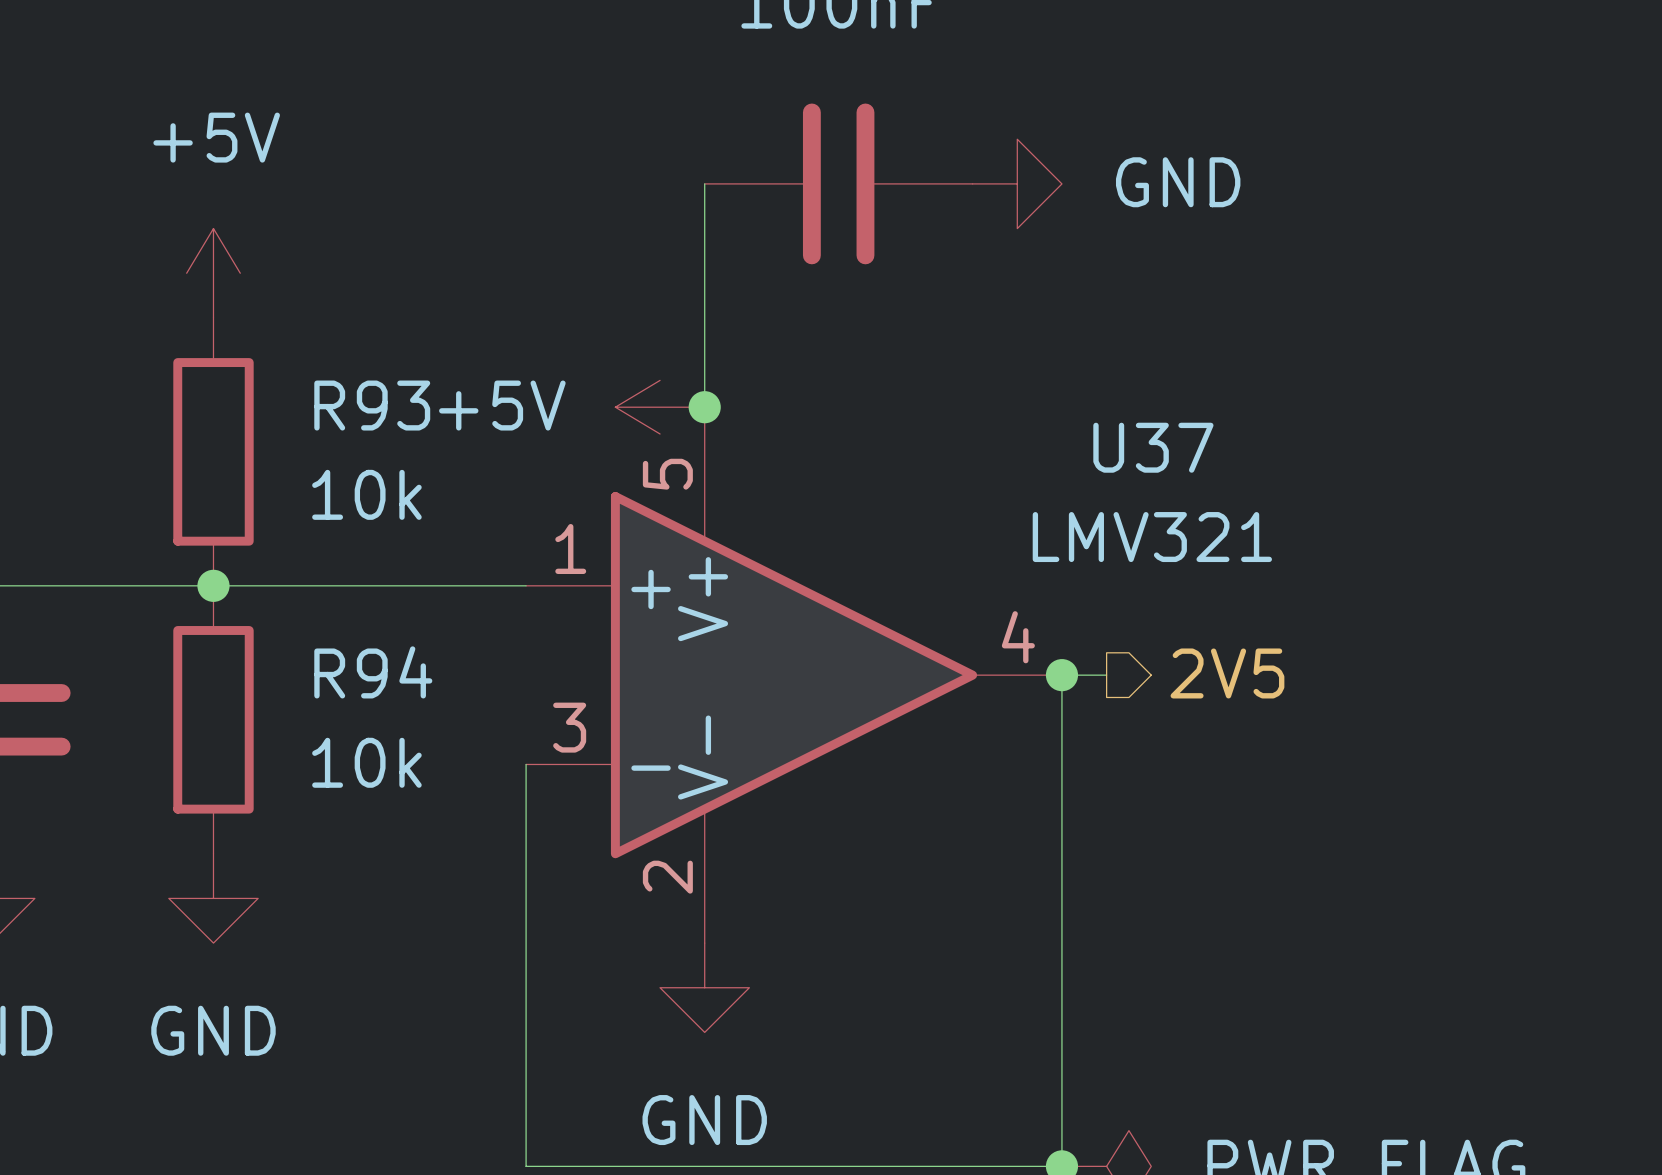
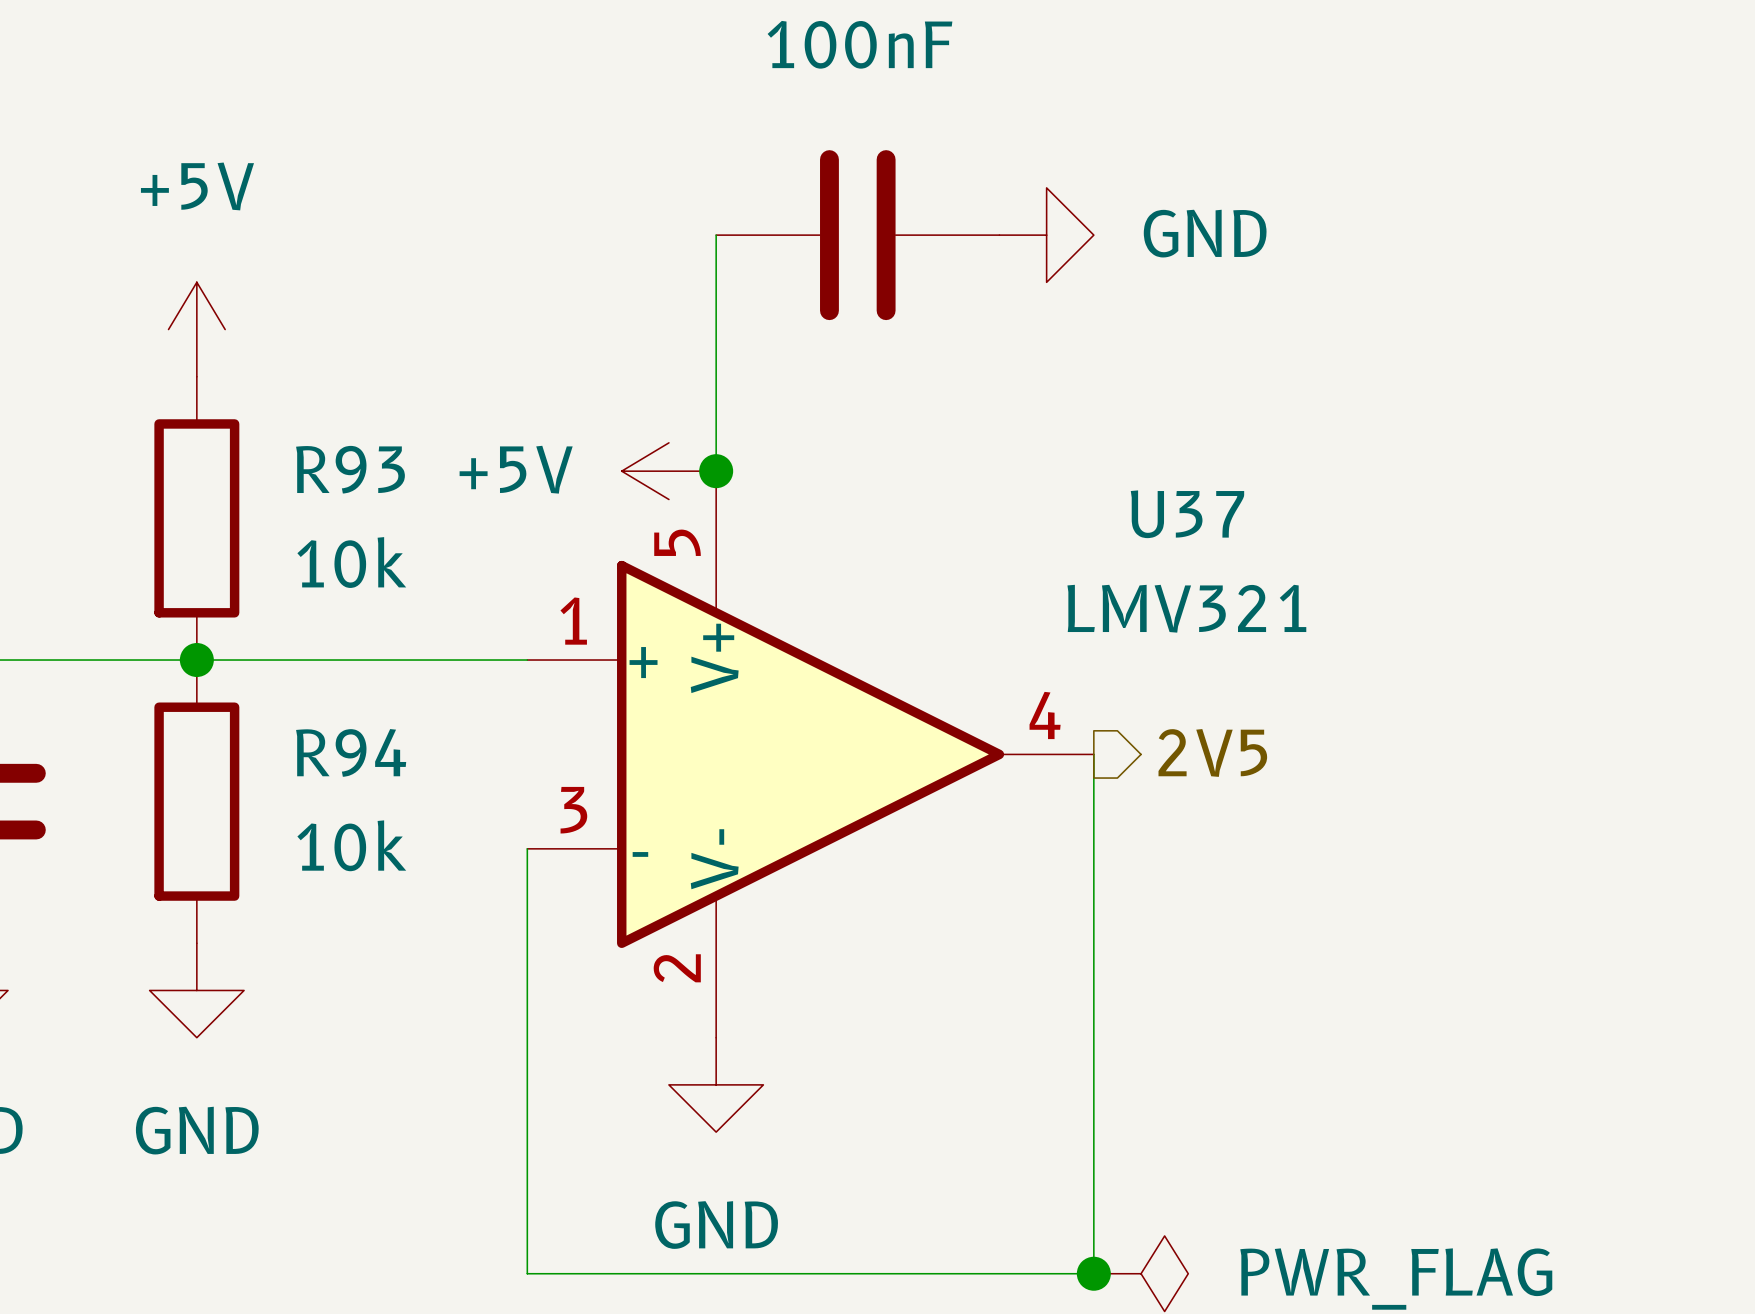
hierarchical label position: 2V5 (1227, 673) -> 2V5 (1212, 752)
wire: (1061, 675) (1106, 675) -> none
junction: (1061, 675) -> none

